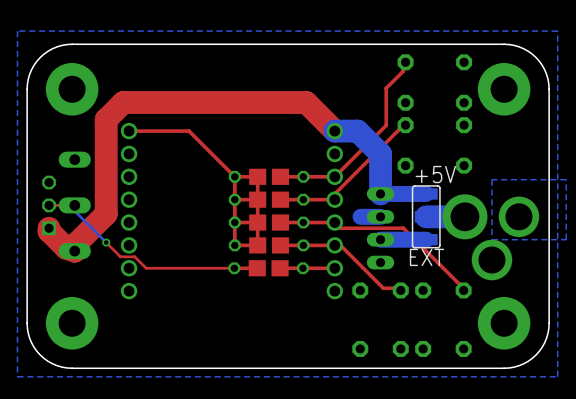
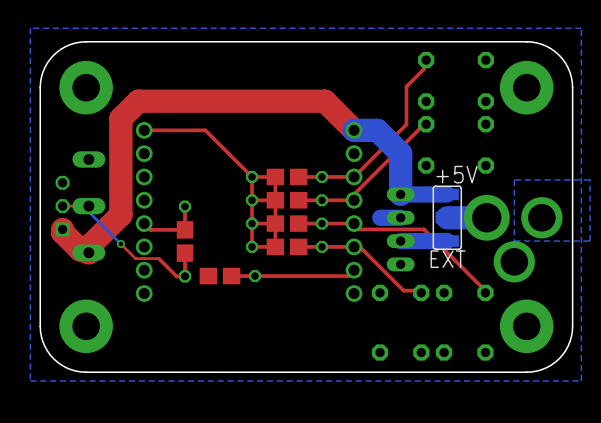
top track: none -> (185, 206) (185, 229) (150, 229) (144, 223)
part: none -> (185, 241)
top track: (134, 256) (146, 268) (257, 268) -> (150, 258) (158, 258) (176, 276) (185, 276) (185, 253)
part: (268, 268) -> none
top track: (334, 268) (280, 268) -> (354, 270) (348, 276) (231, 276)
part: none -> (219, 276)

